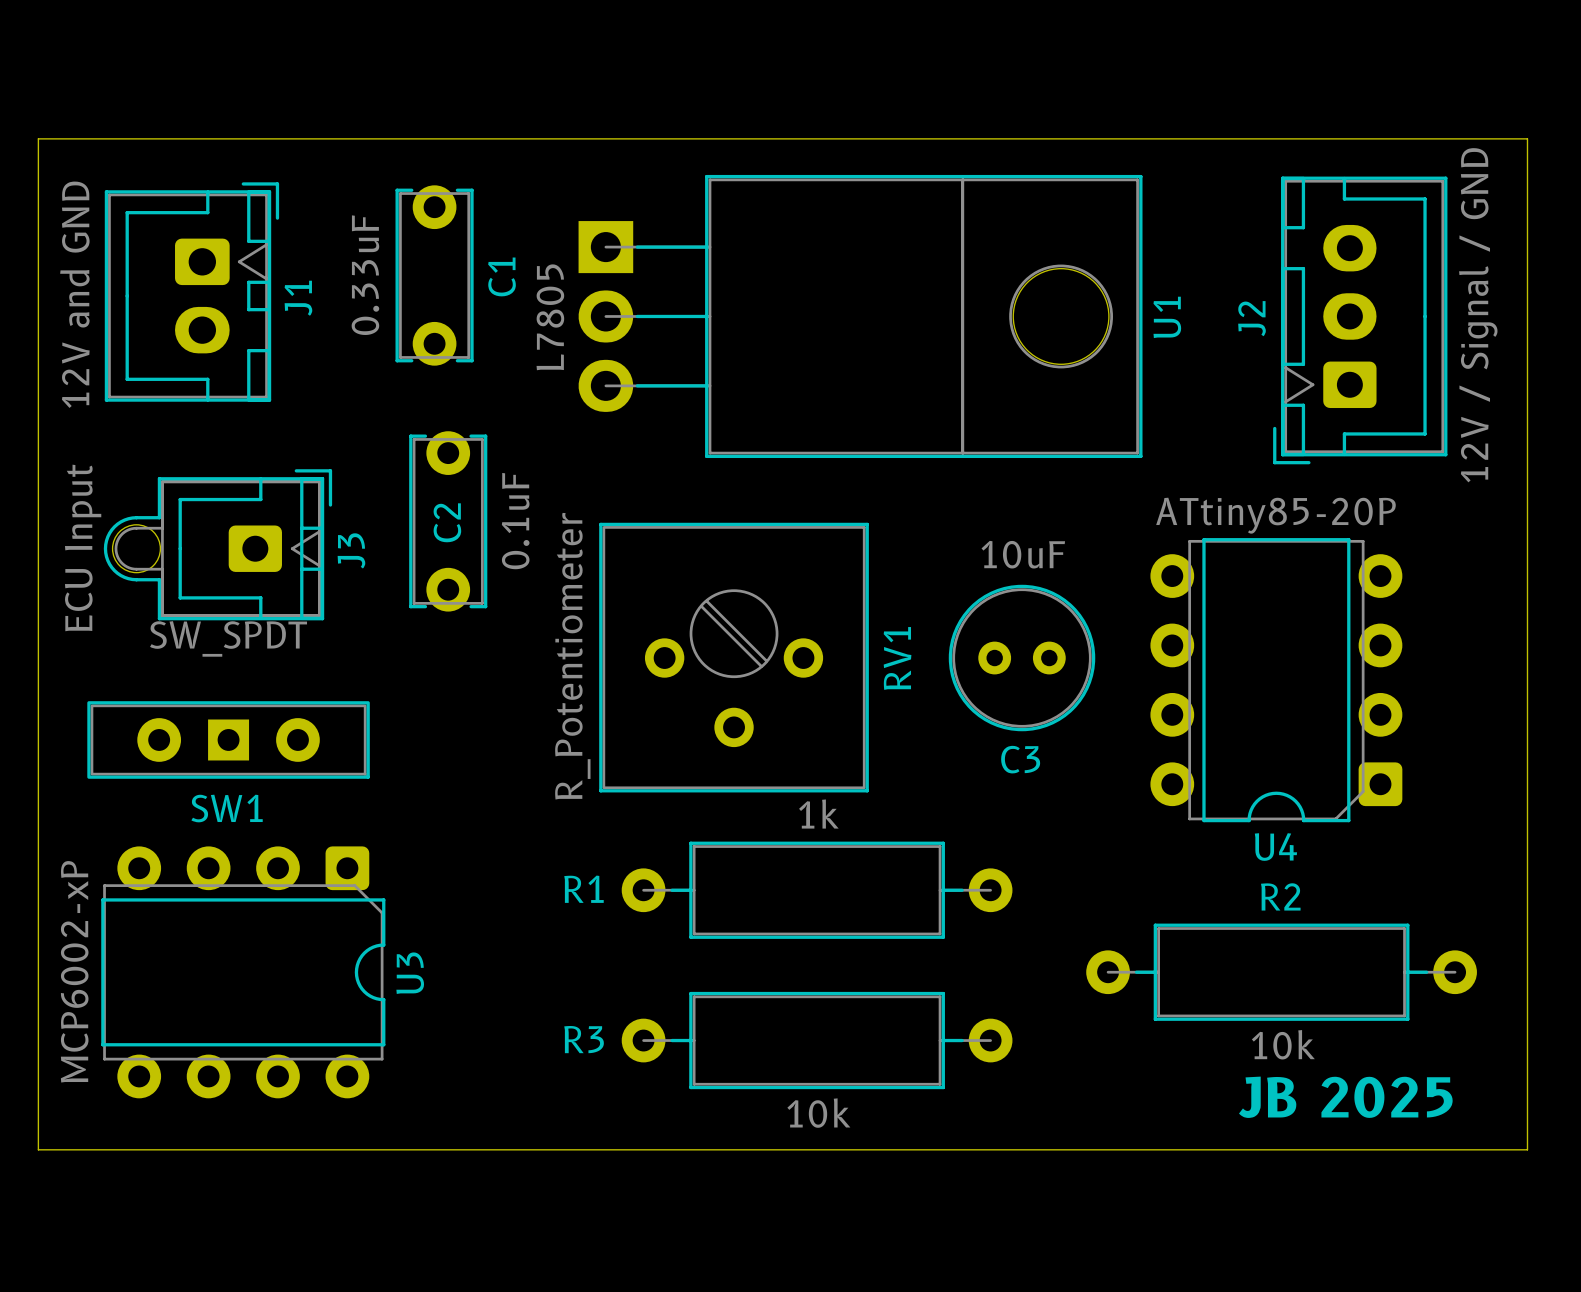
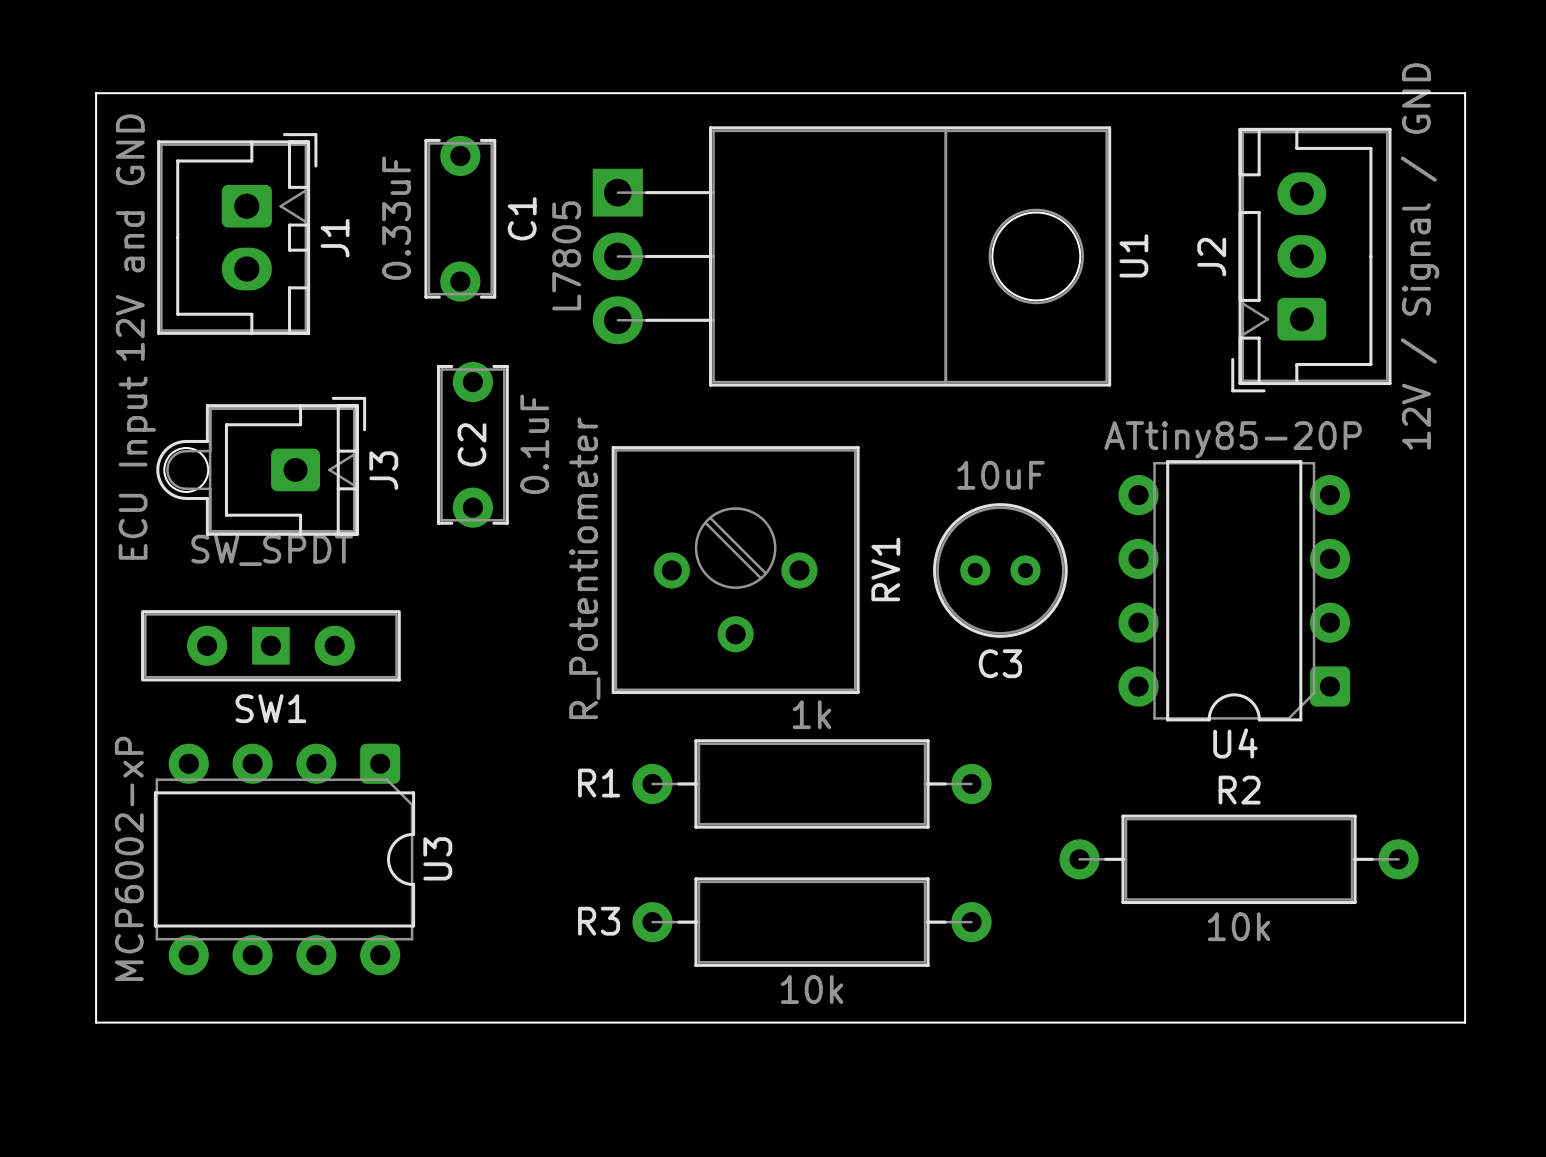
text: JB 2025 (1345, 1097) -> none

